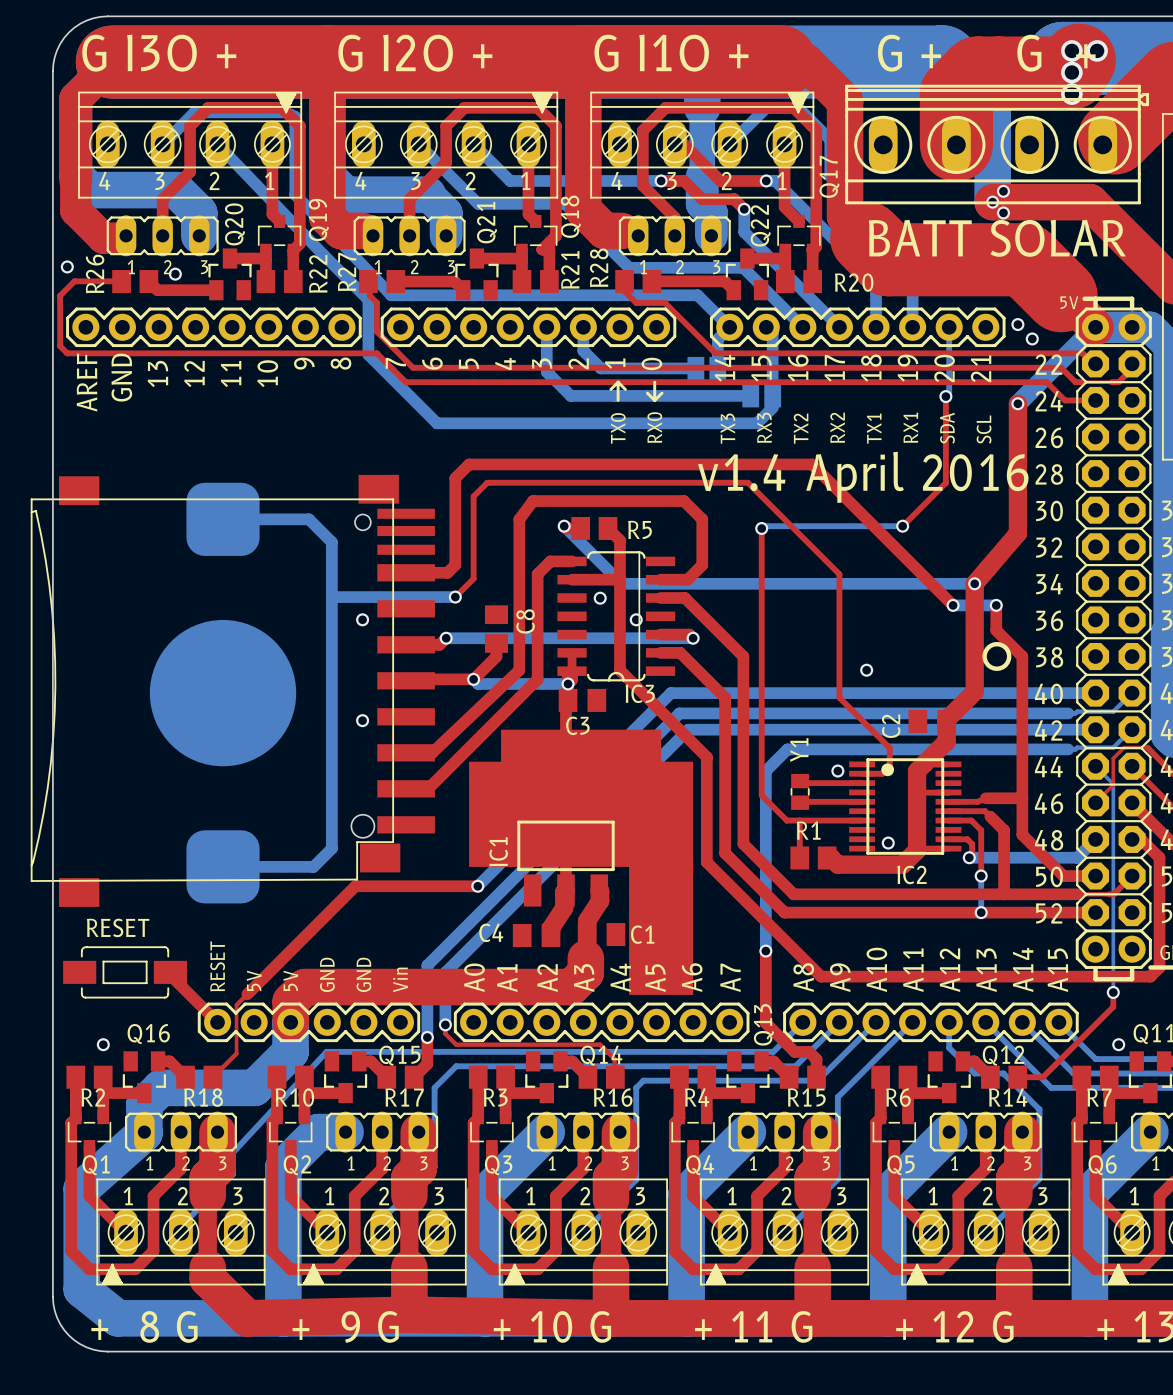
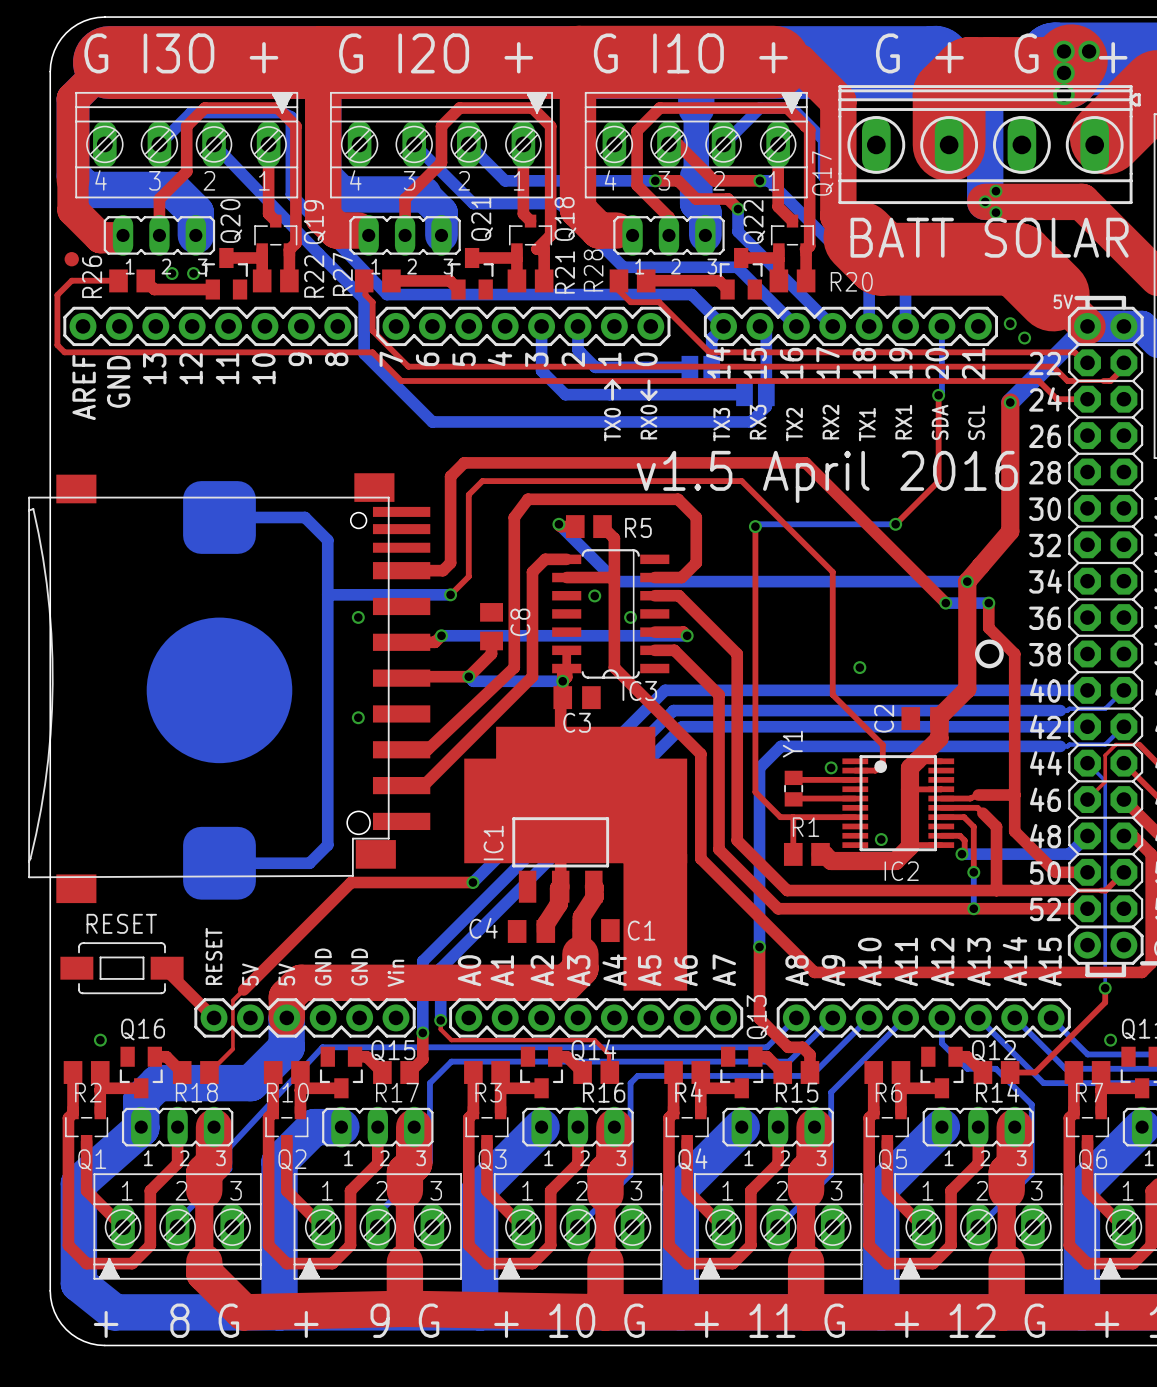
part: none -> (71, 259)
via: (67, 266) -> none
via: none -> (193, 273)
text: v1.4 April 2016 (863, 477) -> v1.5 April 2016 (827, 476)

